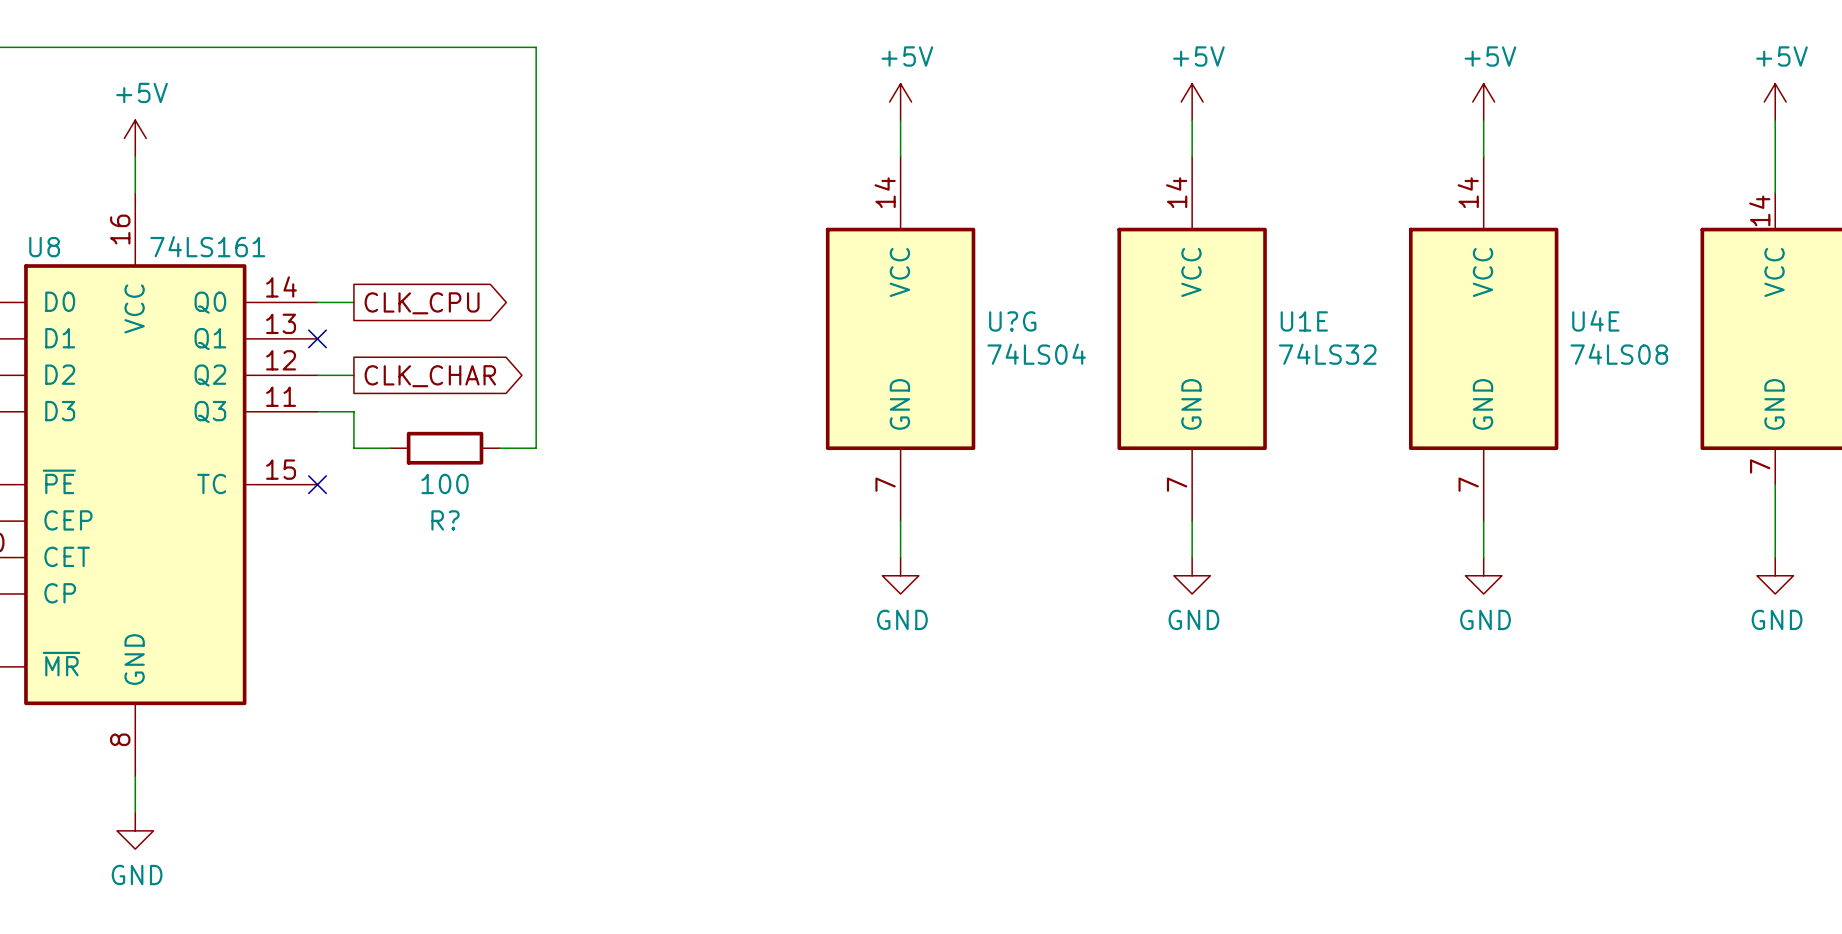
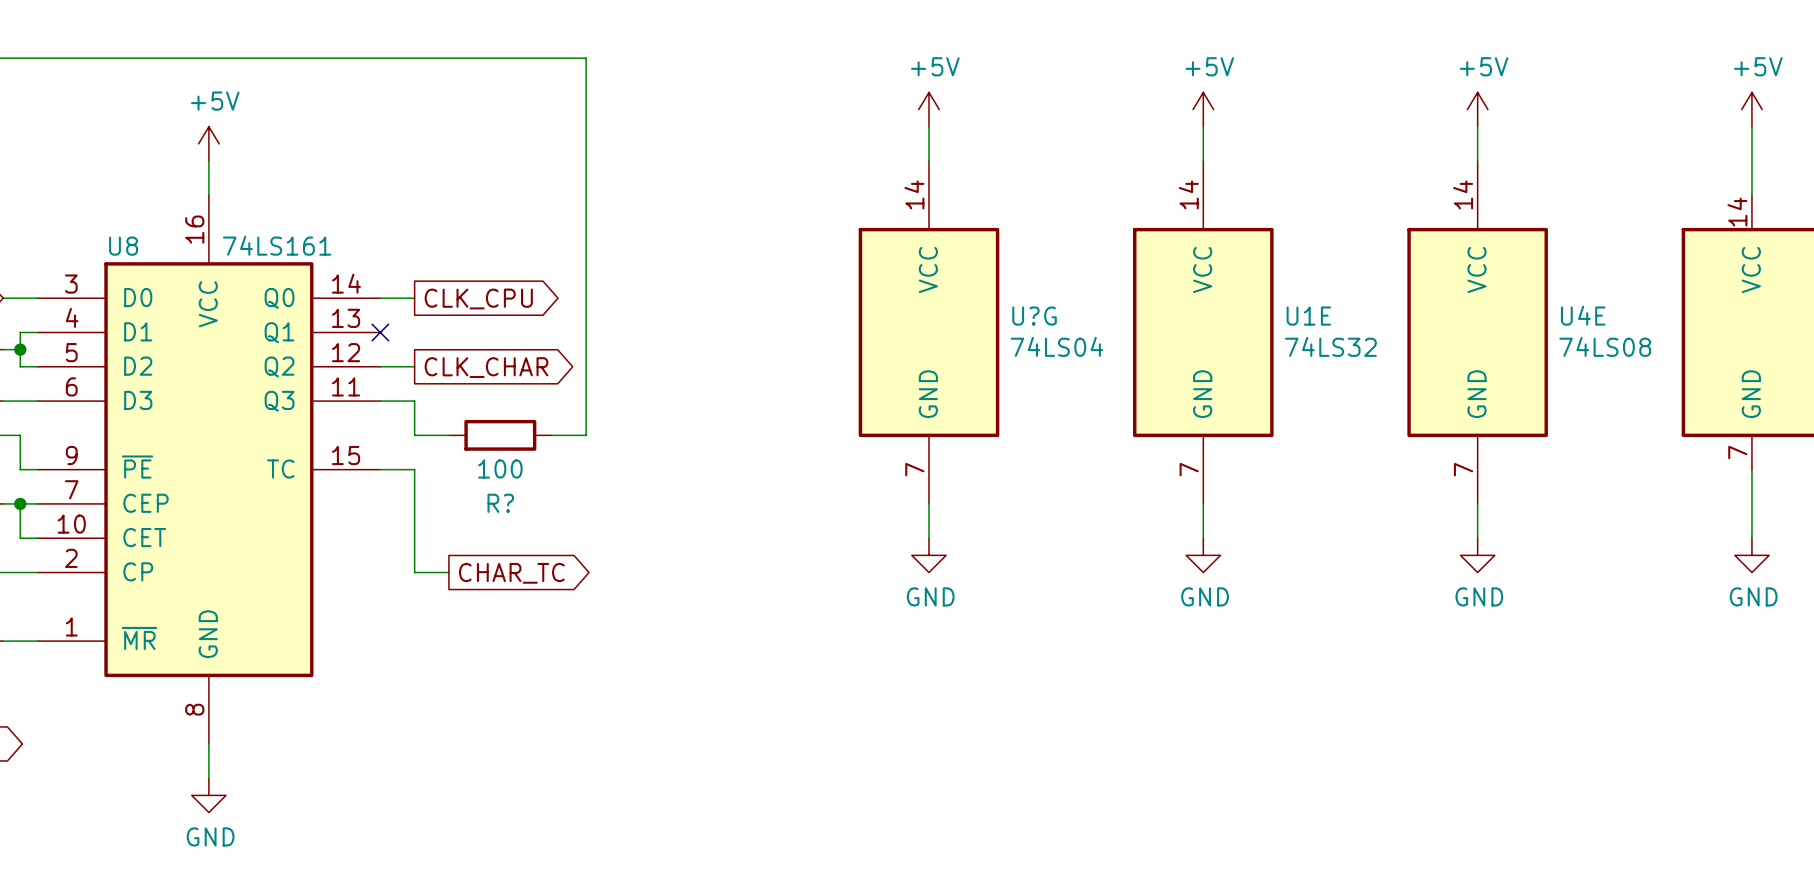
wire: none -> (380, 469) (414, 469) (414, 572) (448, 572)
no-connect mark: (317, 484) -> none
global label: none -> CHAR_TC (511, 573)

